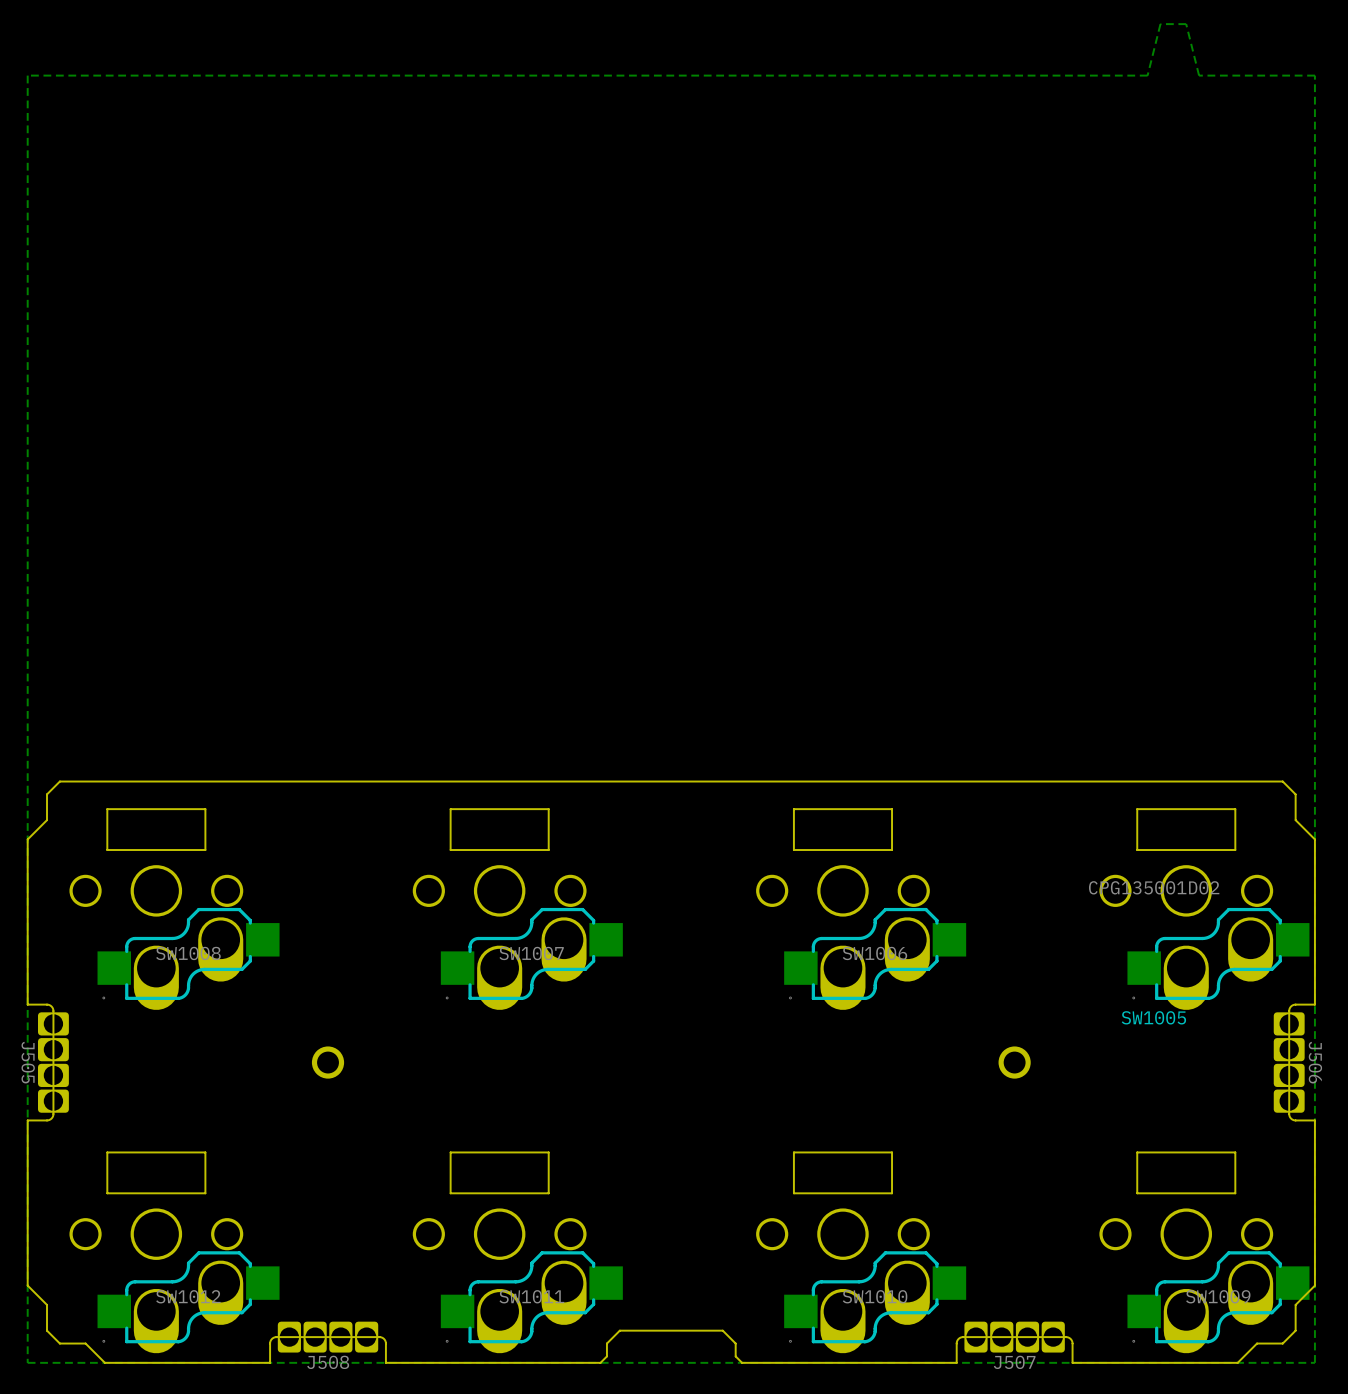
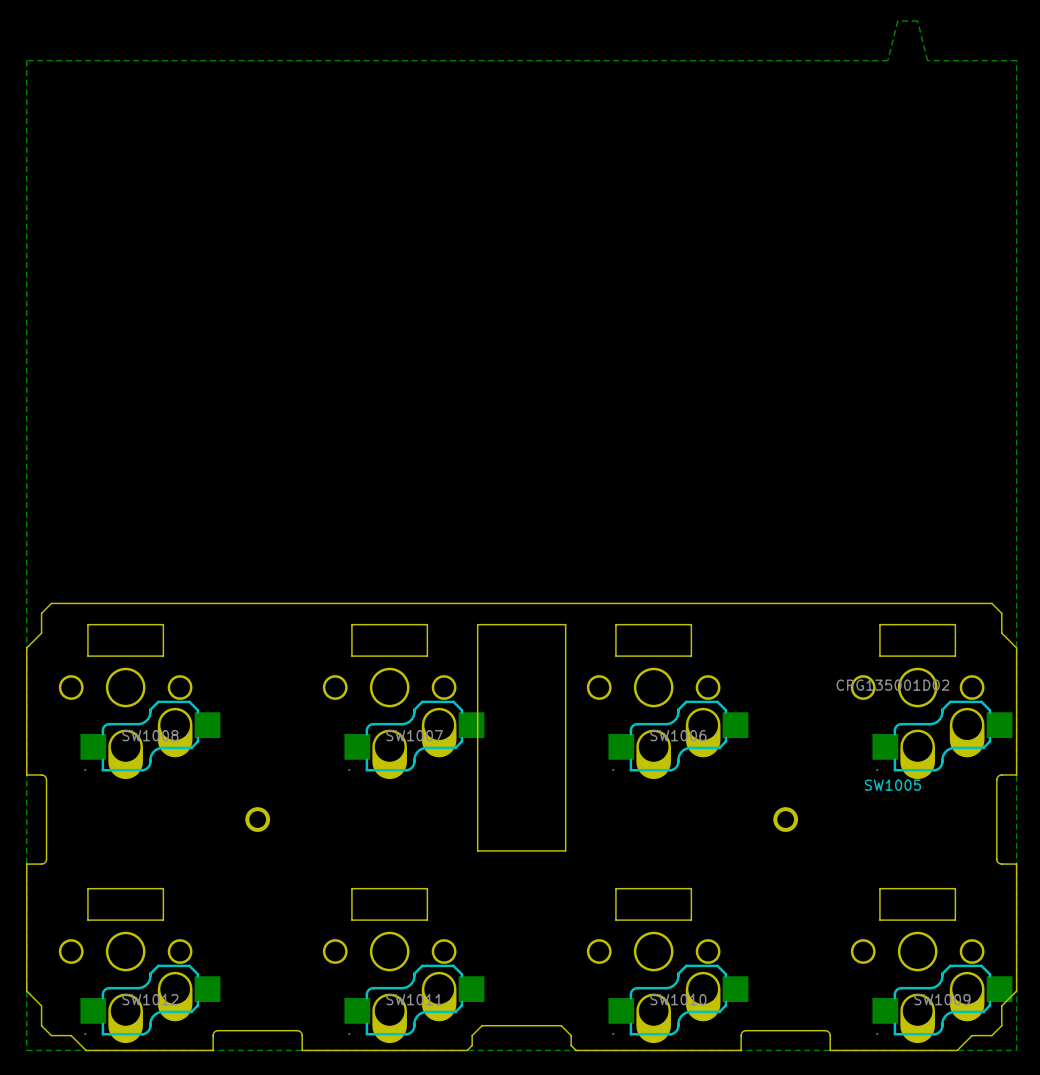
board edge: none -> (565, 624) (477, 624) (477, 850) (565, 850) (565, 624)
J505: (53, 1062) -> none
J506: (1289, 1062) -> none
J508: (328, 1337) -> none
J507: (1014, 1337) -> none

